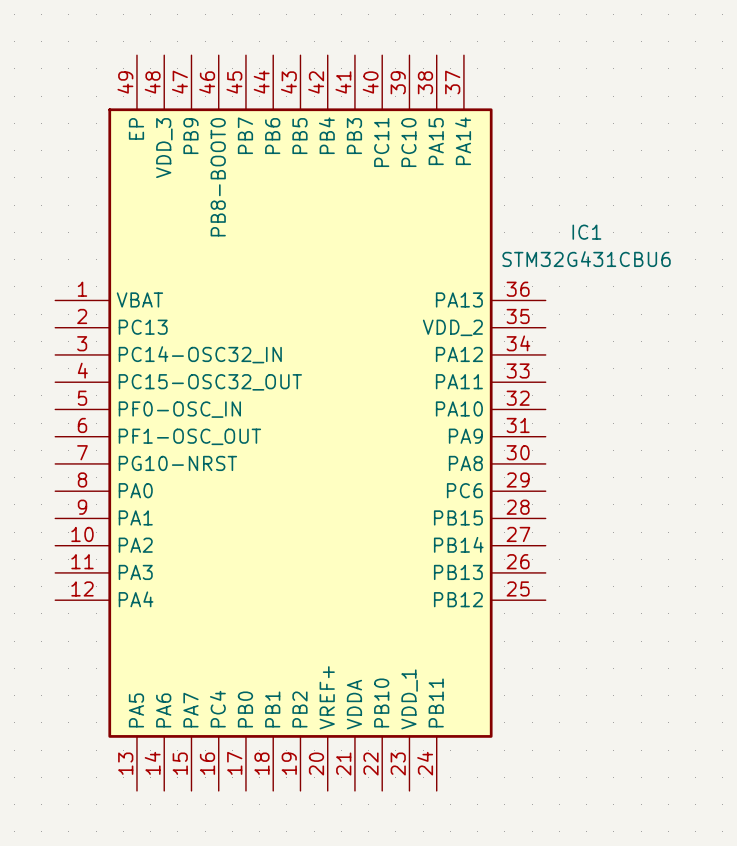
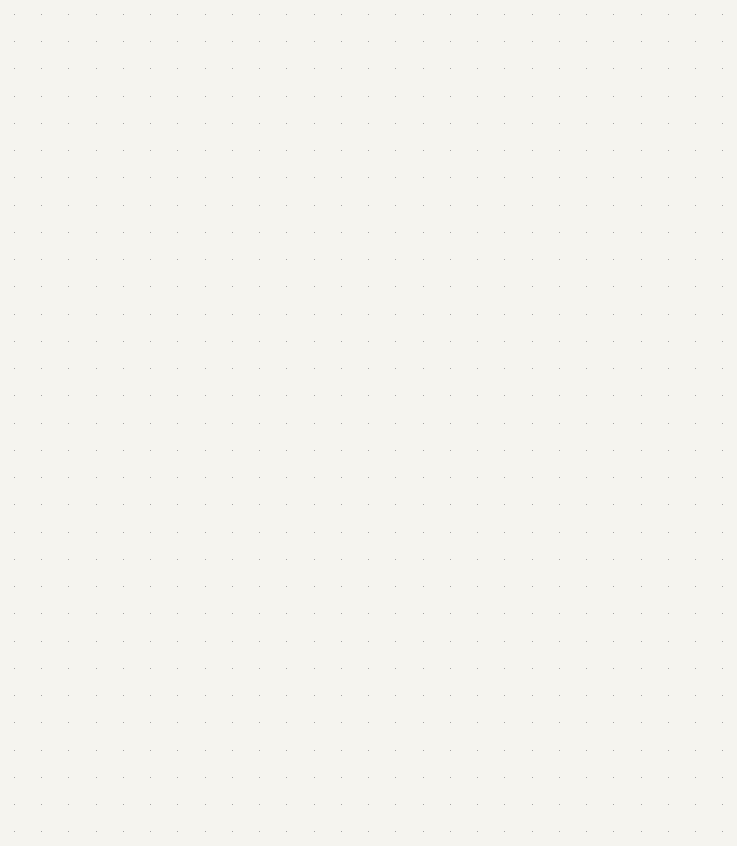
IC1: STM32G431CBU6 (300, 423) -> none

